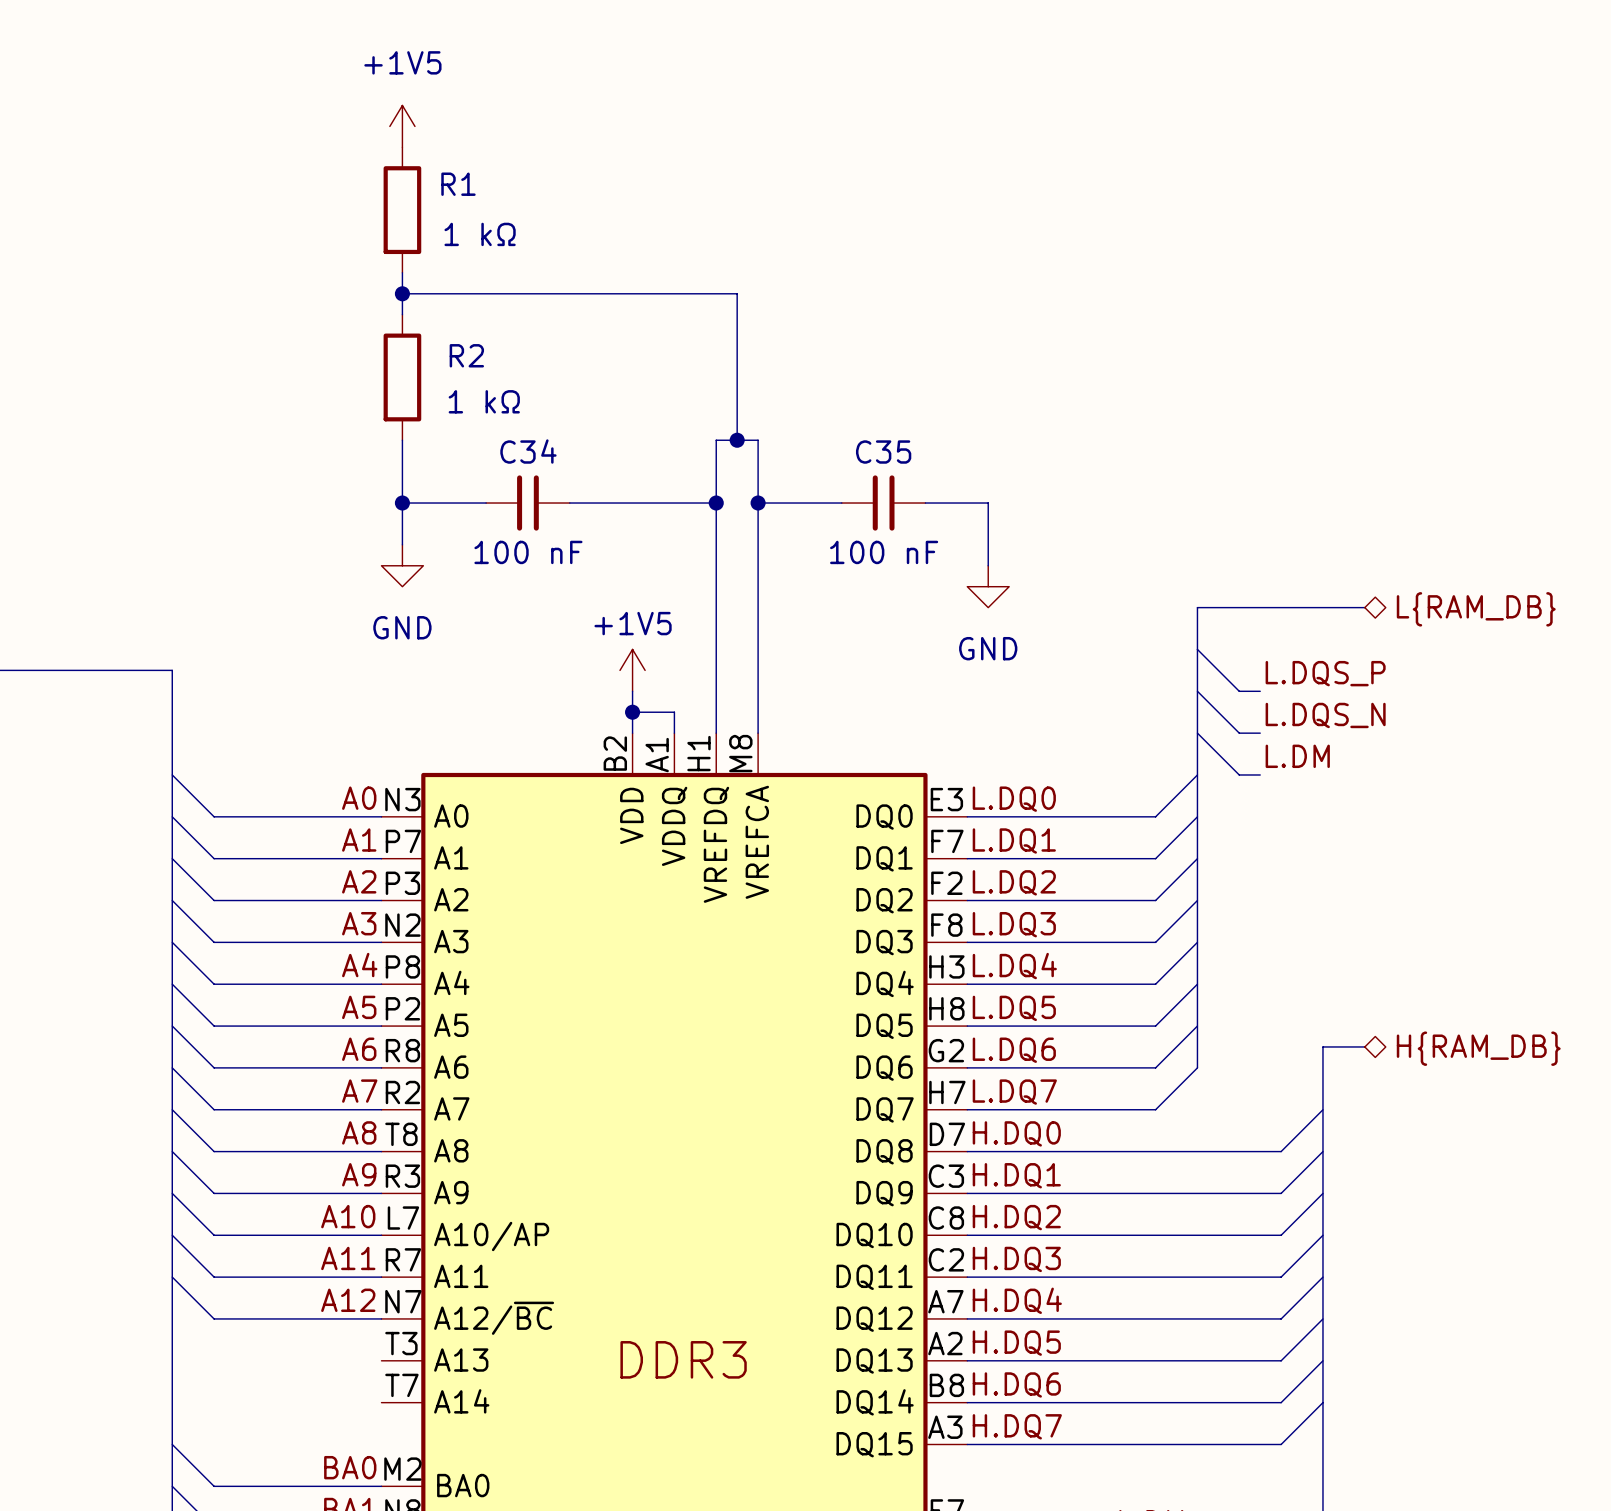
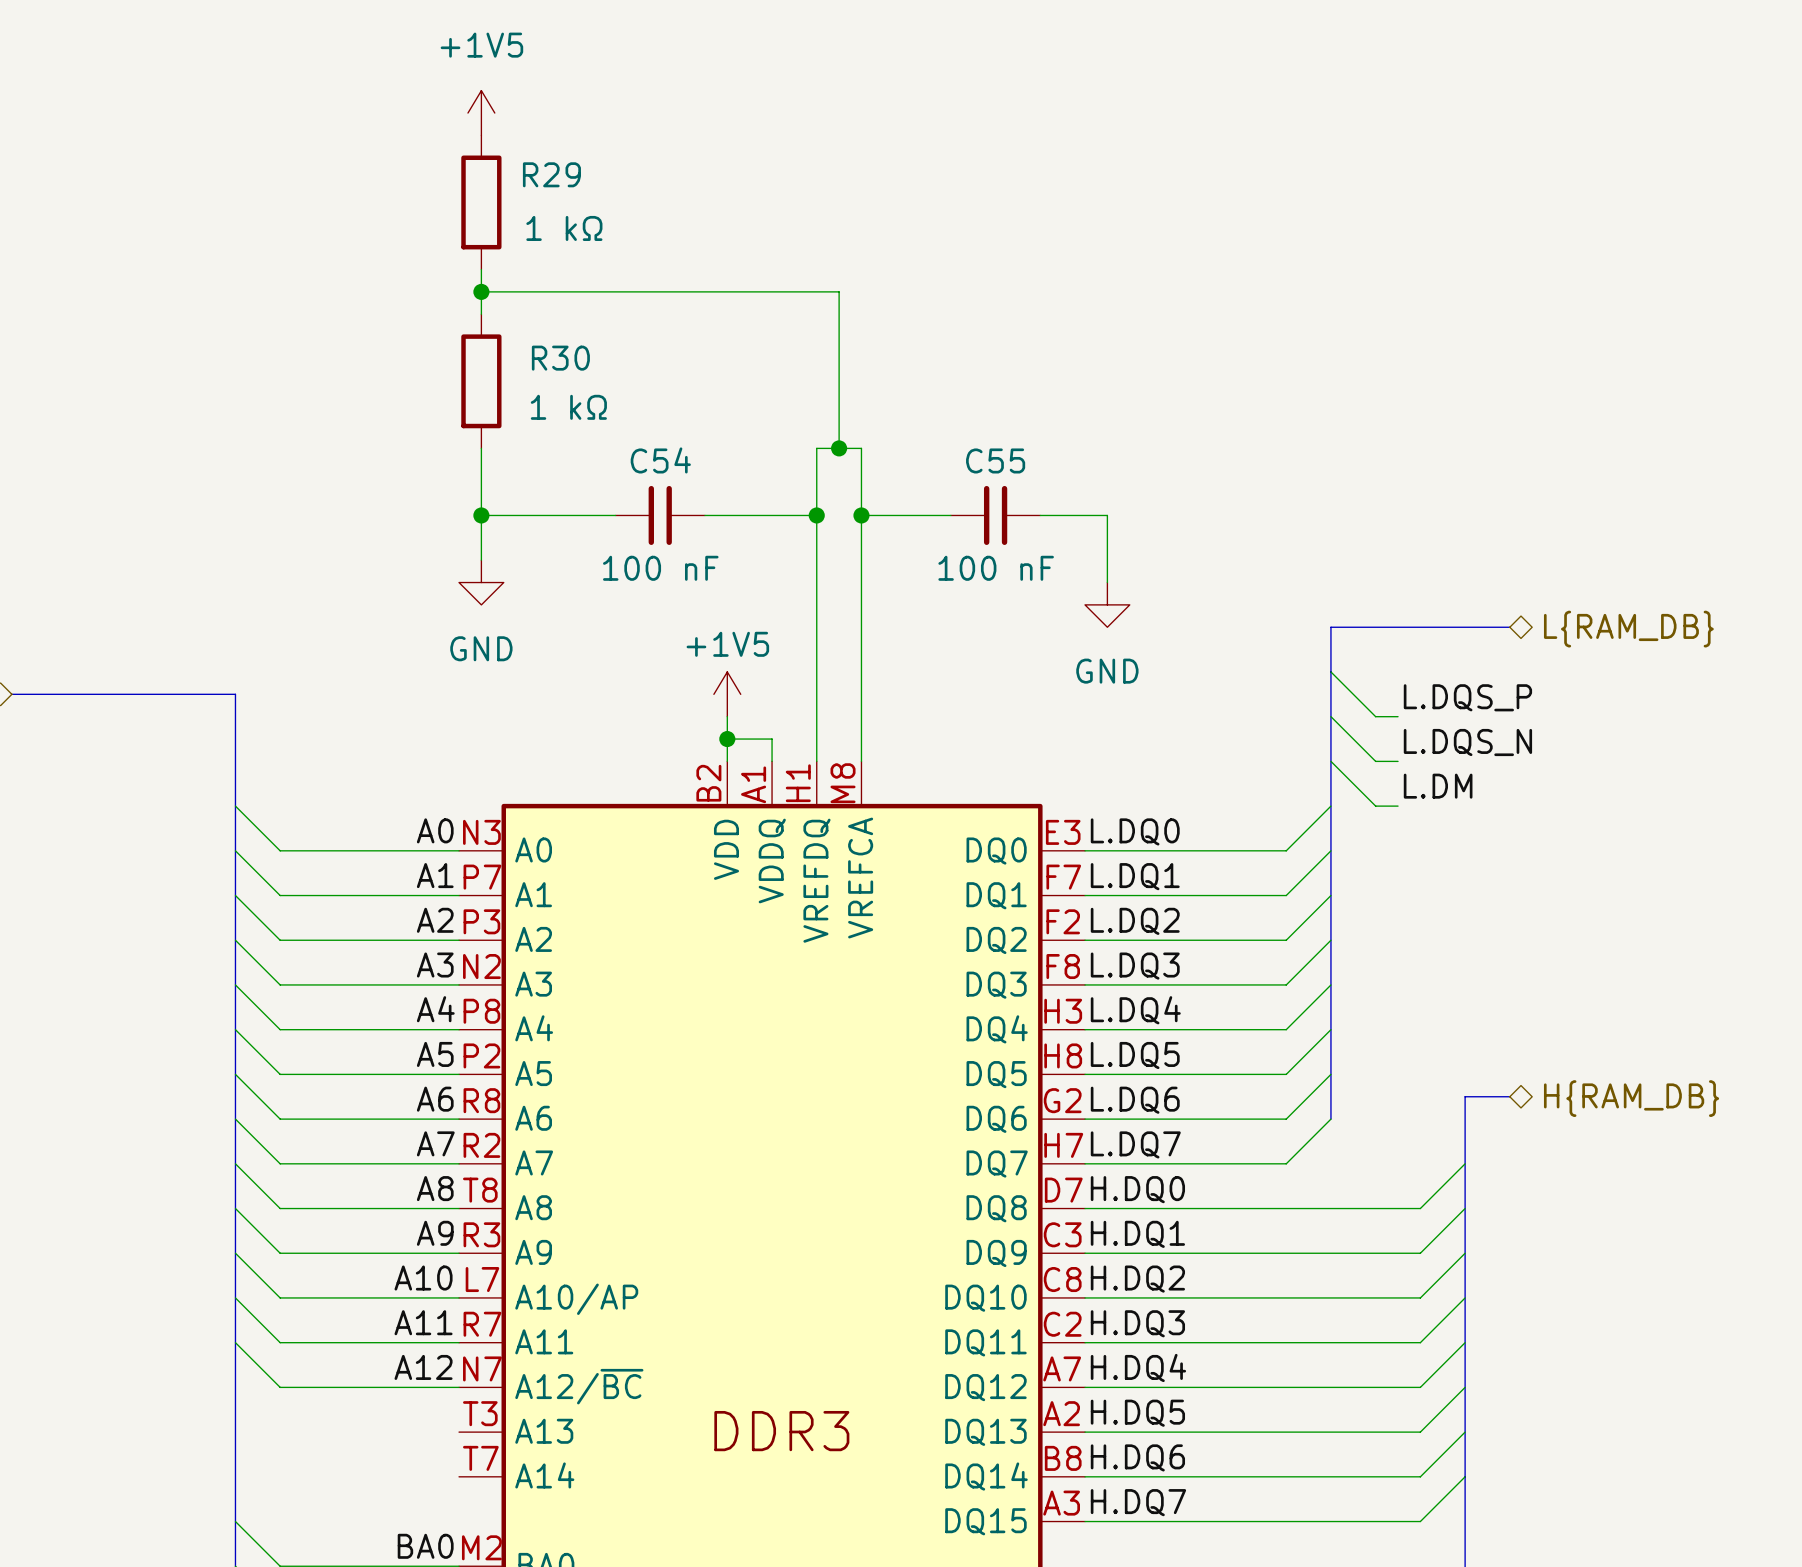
R1 name: R1 (458, 184) -> R29 (551, 174)
R2 name: R2 (466, 355) -> R30 (560, 358)
C35 name: C35 (883, 452) -> C55 (995, 460)
C34: 100 nF (527, 503) -> none
C54: none -> 100 nF (660, 515)

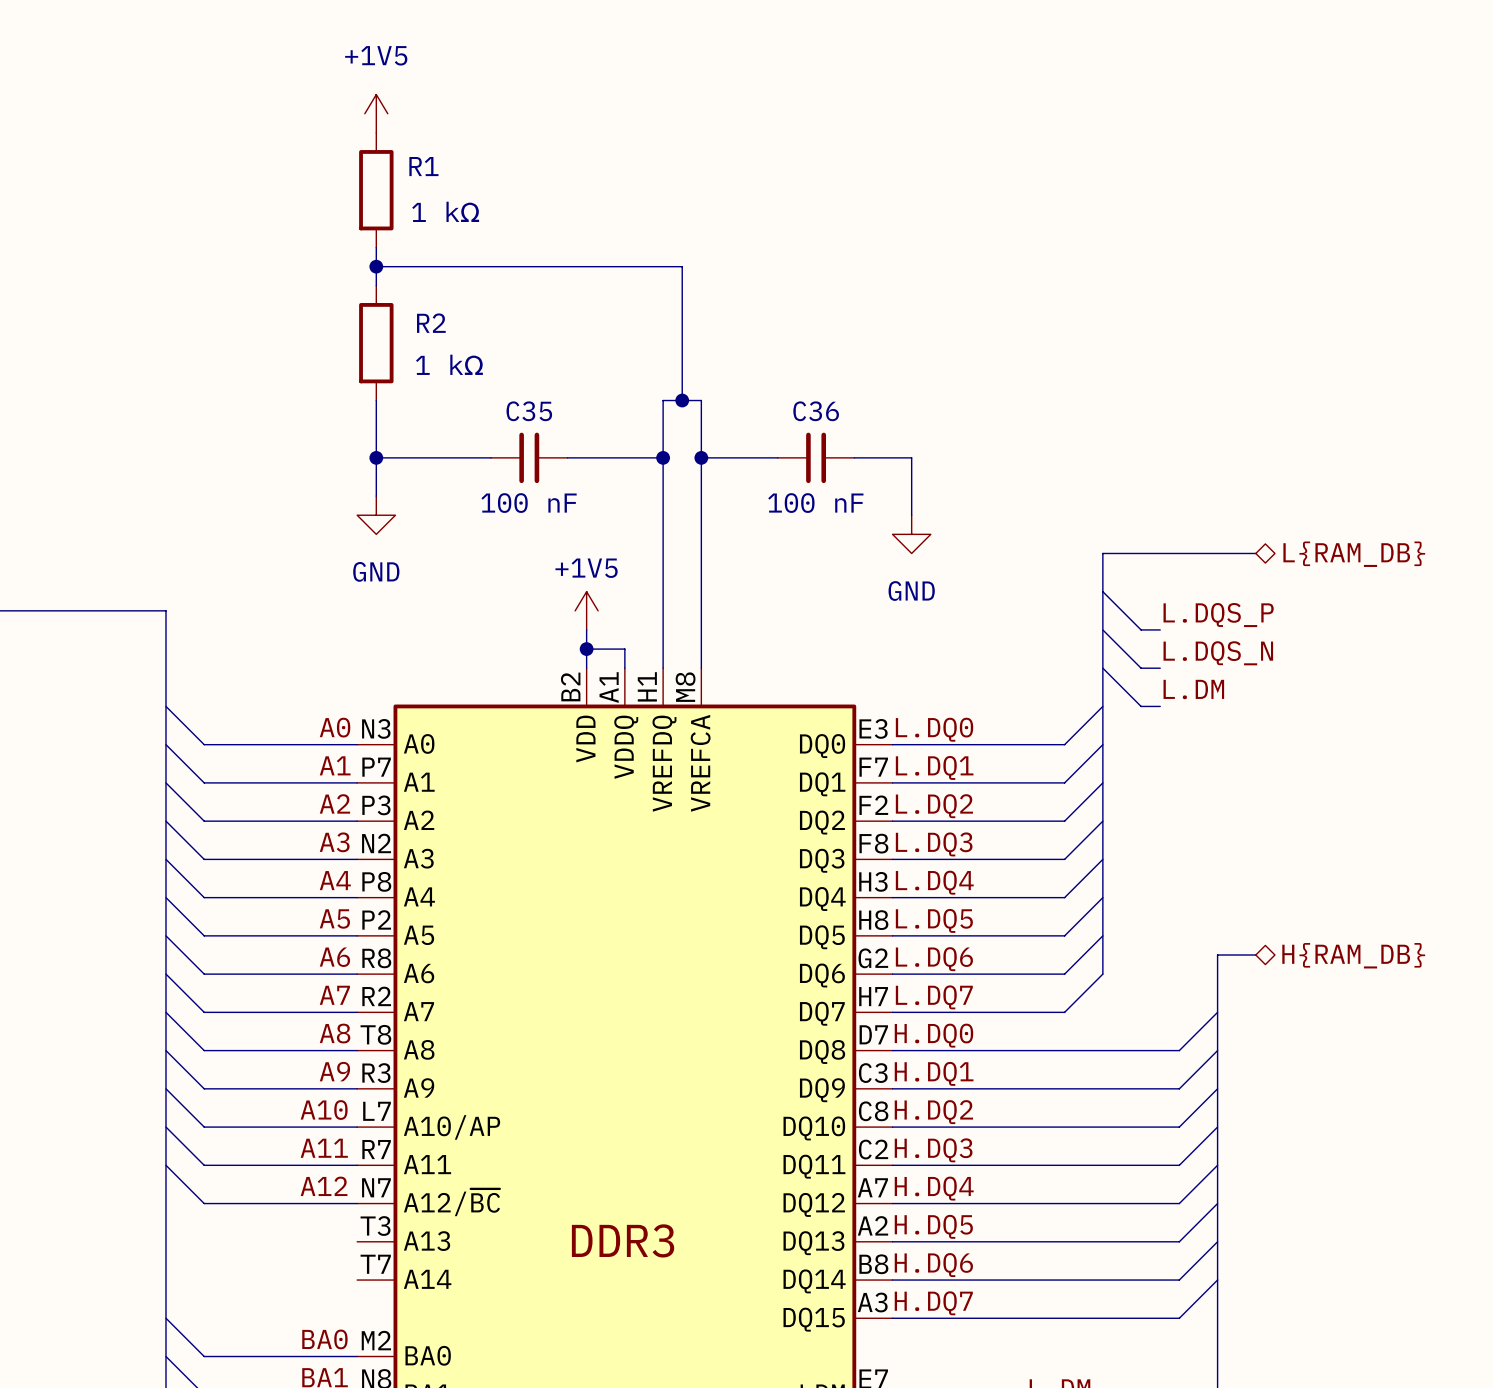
R29 name: R29 (551, 174) -> R1 (423, 166)
R30 name: R30 (560, 358) -> R2 (431, 323)
C54 name: C54 (660, 460) -> C35 (529, 411)
C55 name: C55 (995, 460) -> C36 (816, 411)

